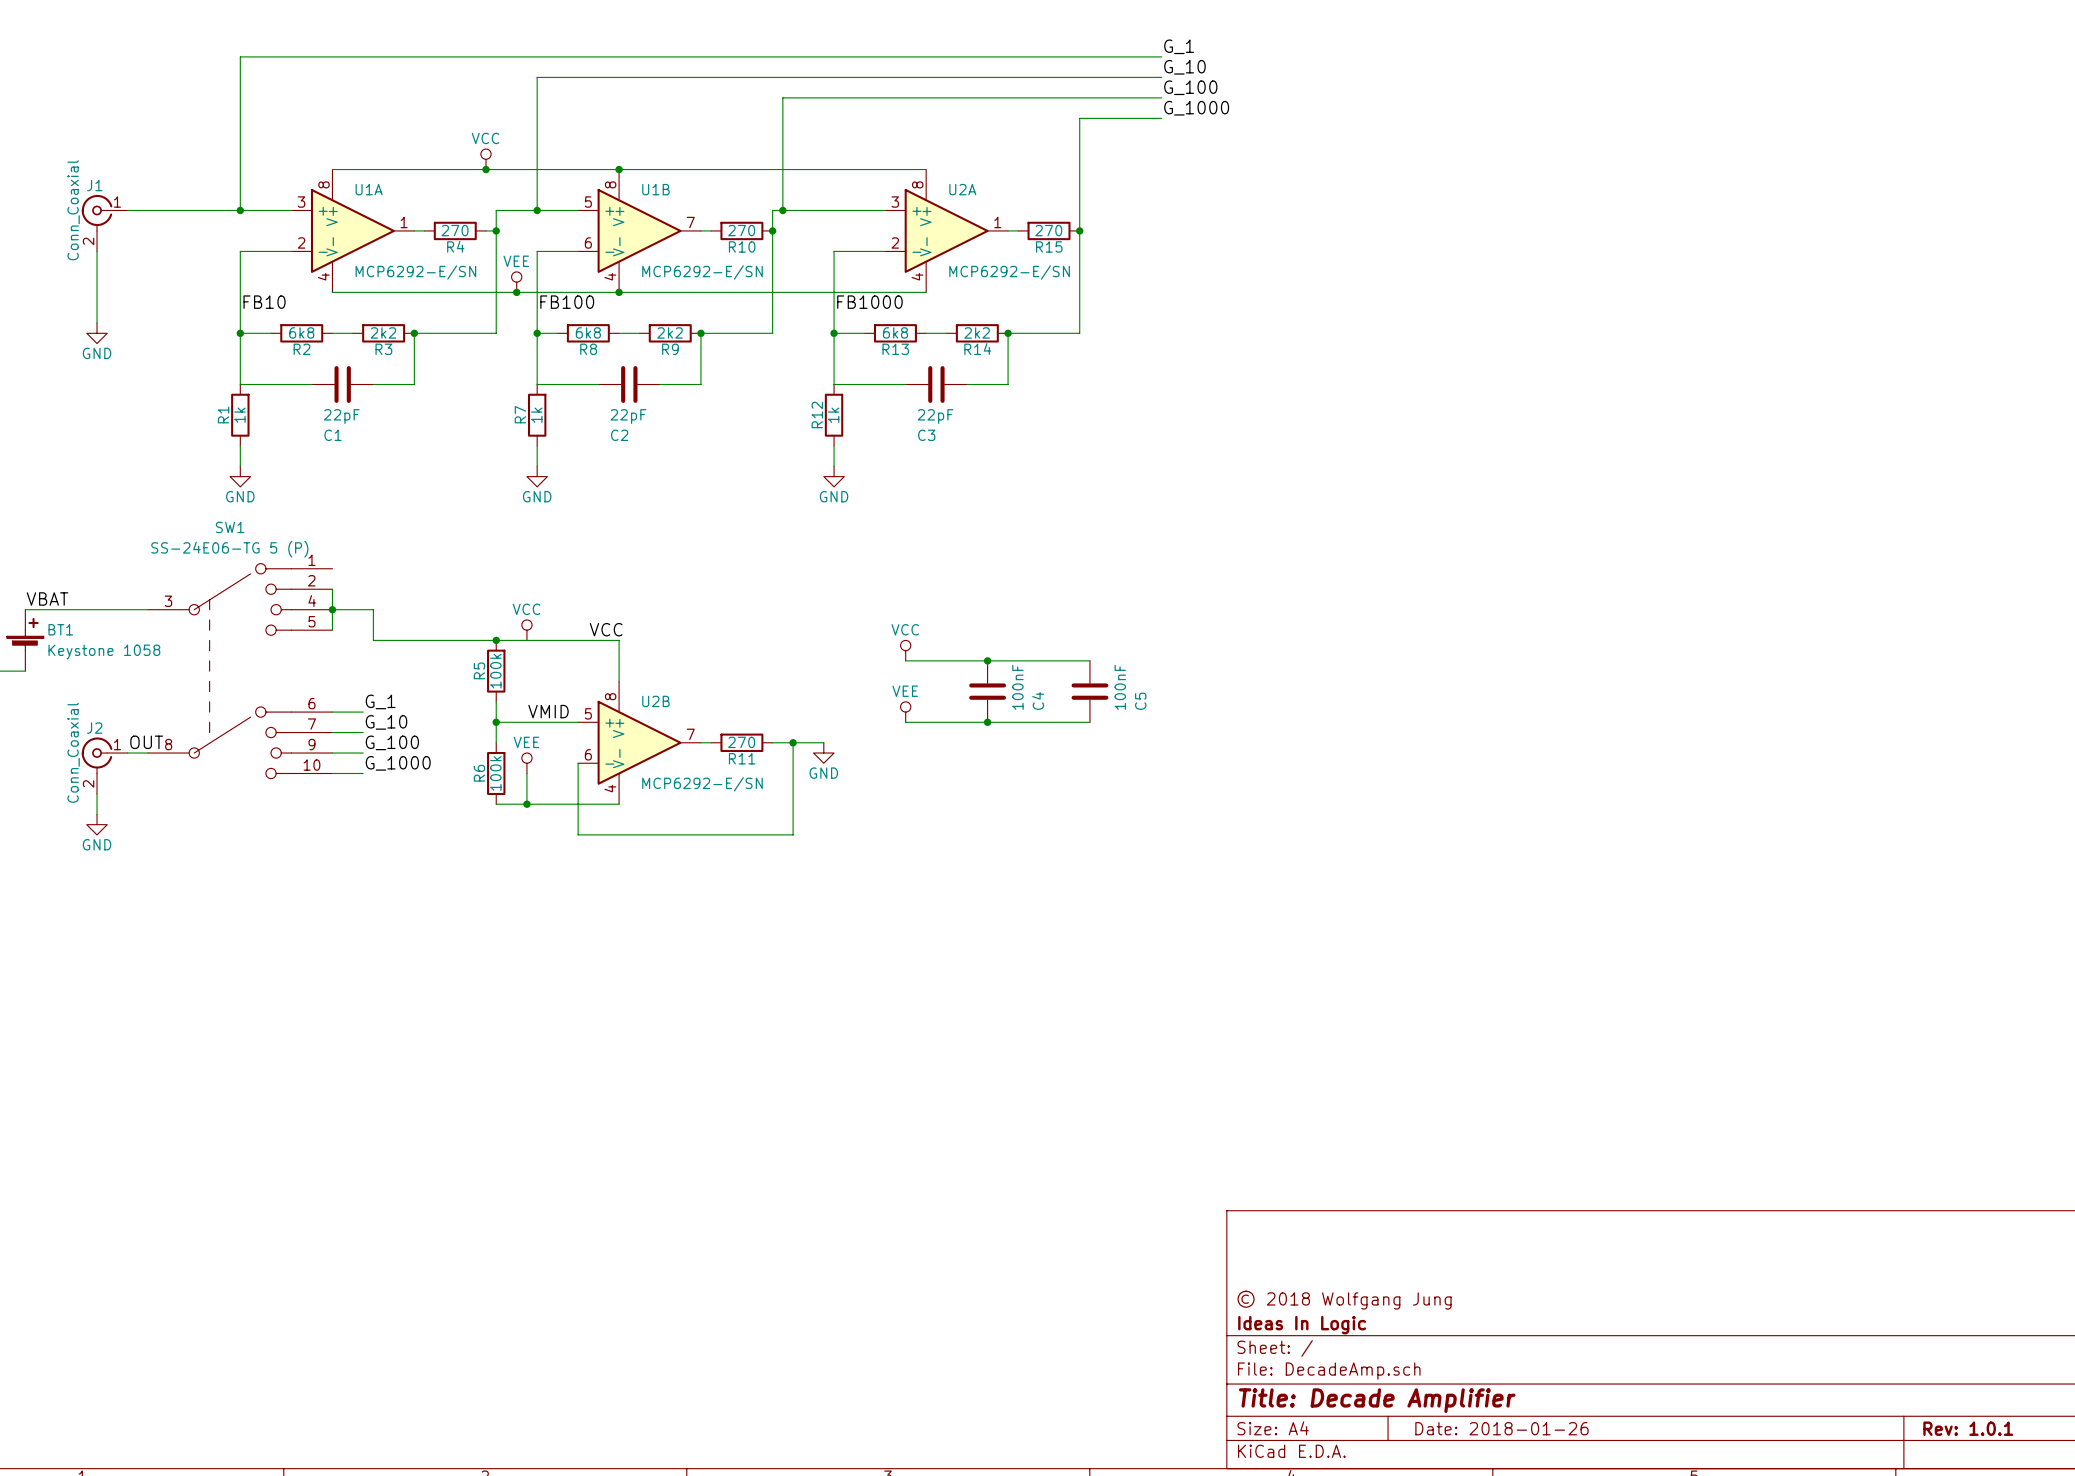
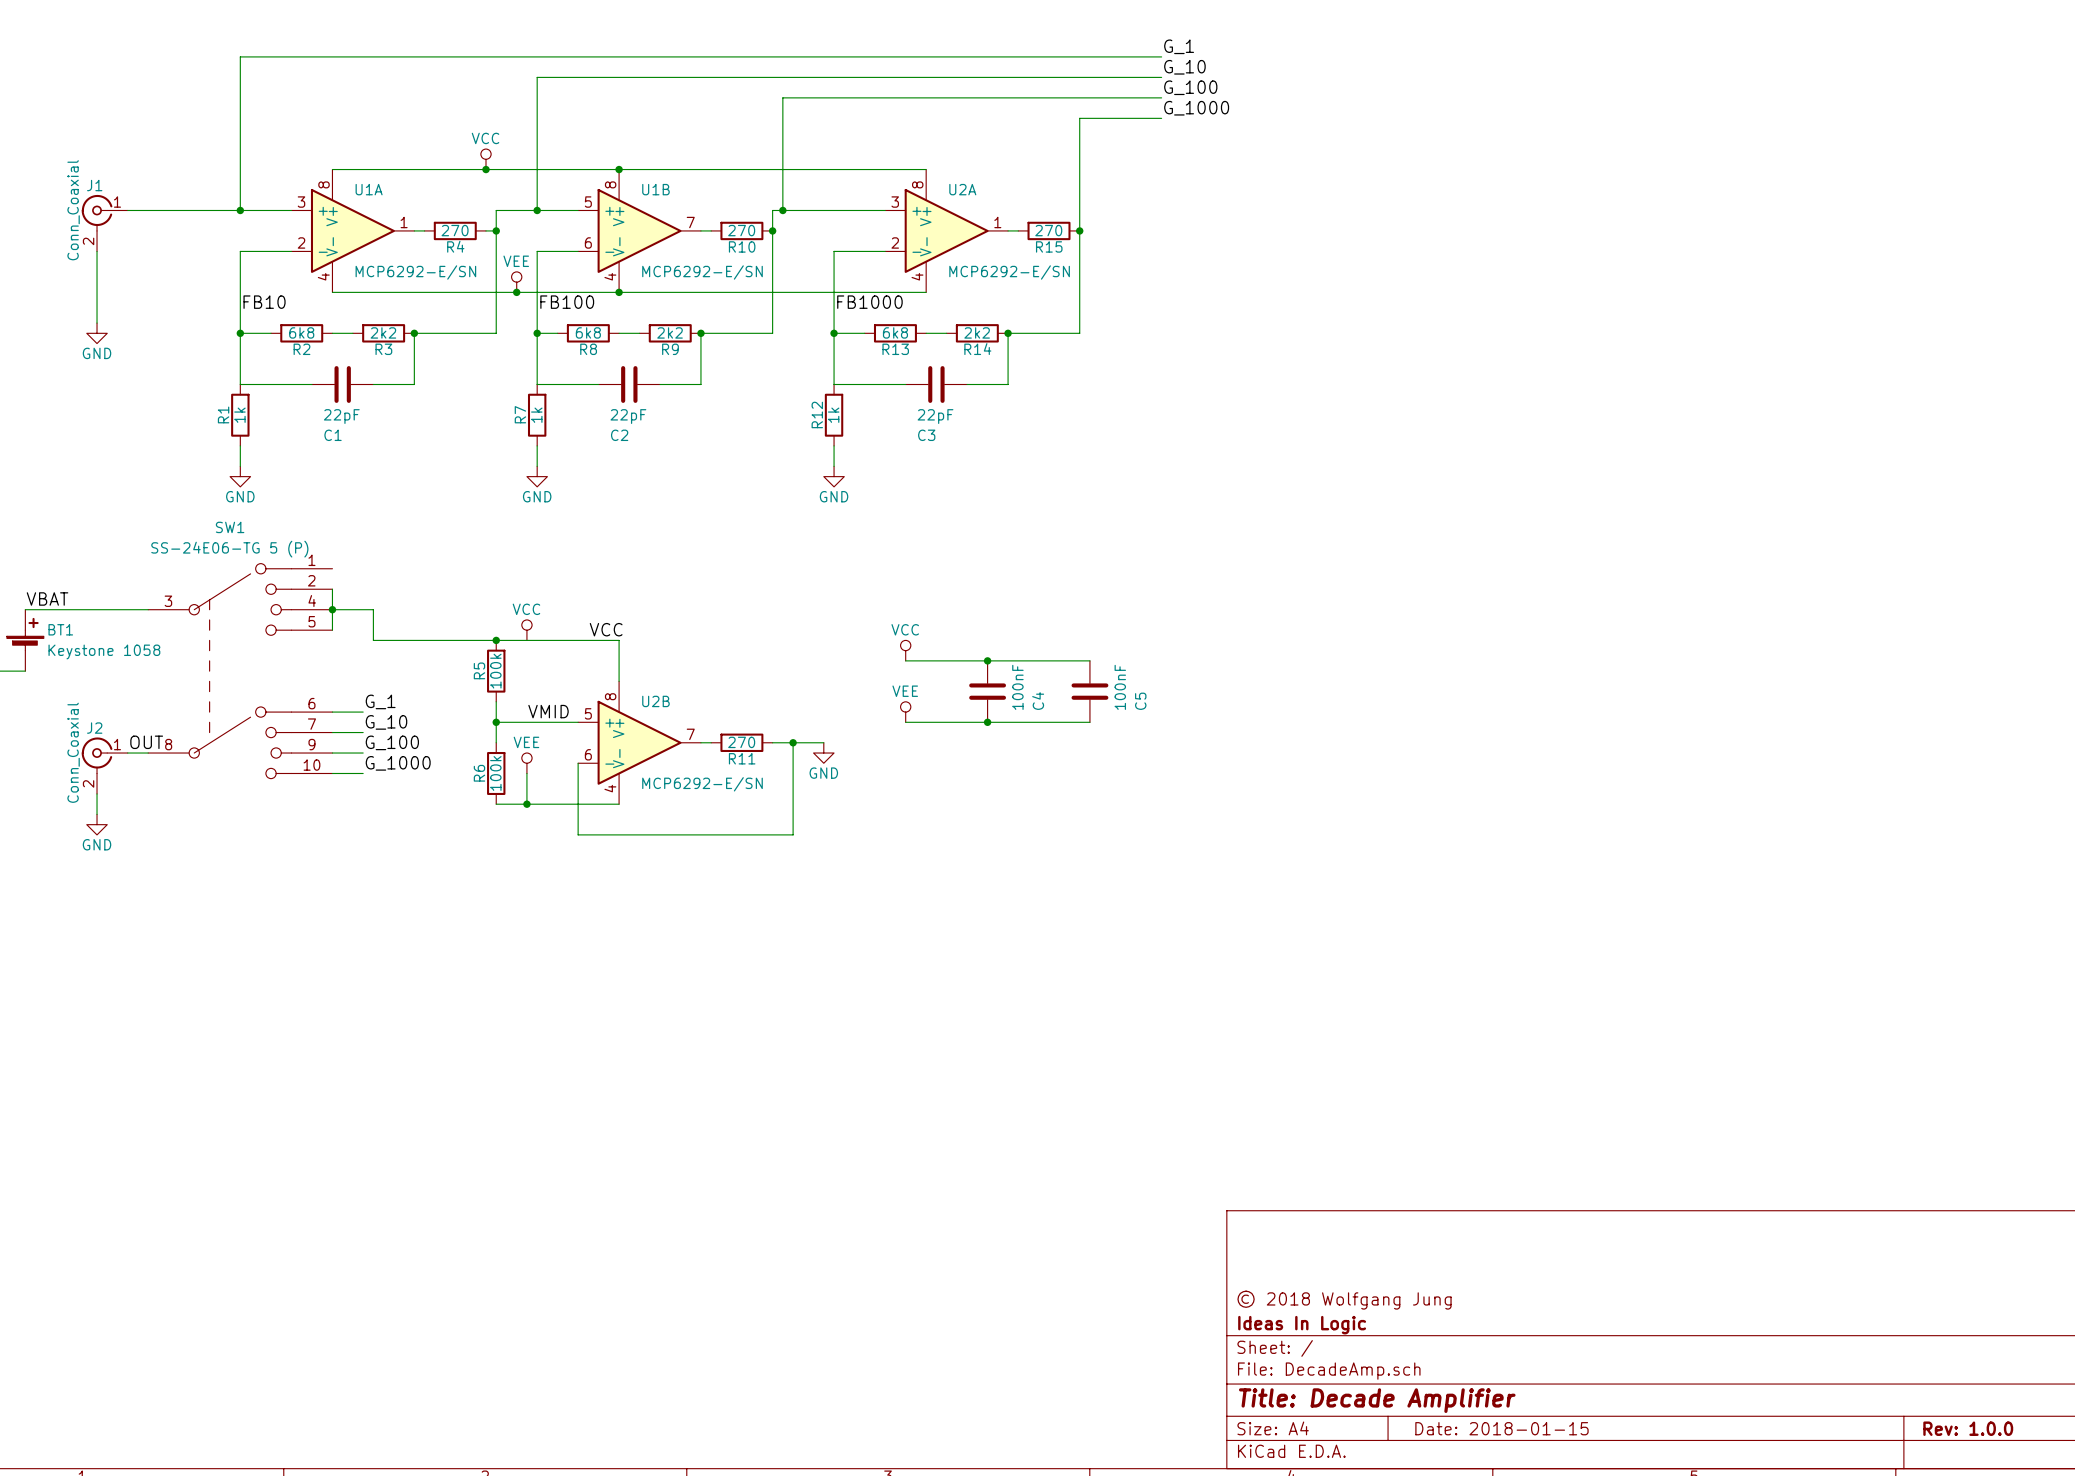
title block: Date: 2018-01-26 (1501, 1428) -> Date: 2018-01-15 (1501, 1428)
title block: Rev: 1.0.1 (1968, 1428) -> Rev: 1.0.0 (1968, 1428)

